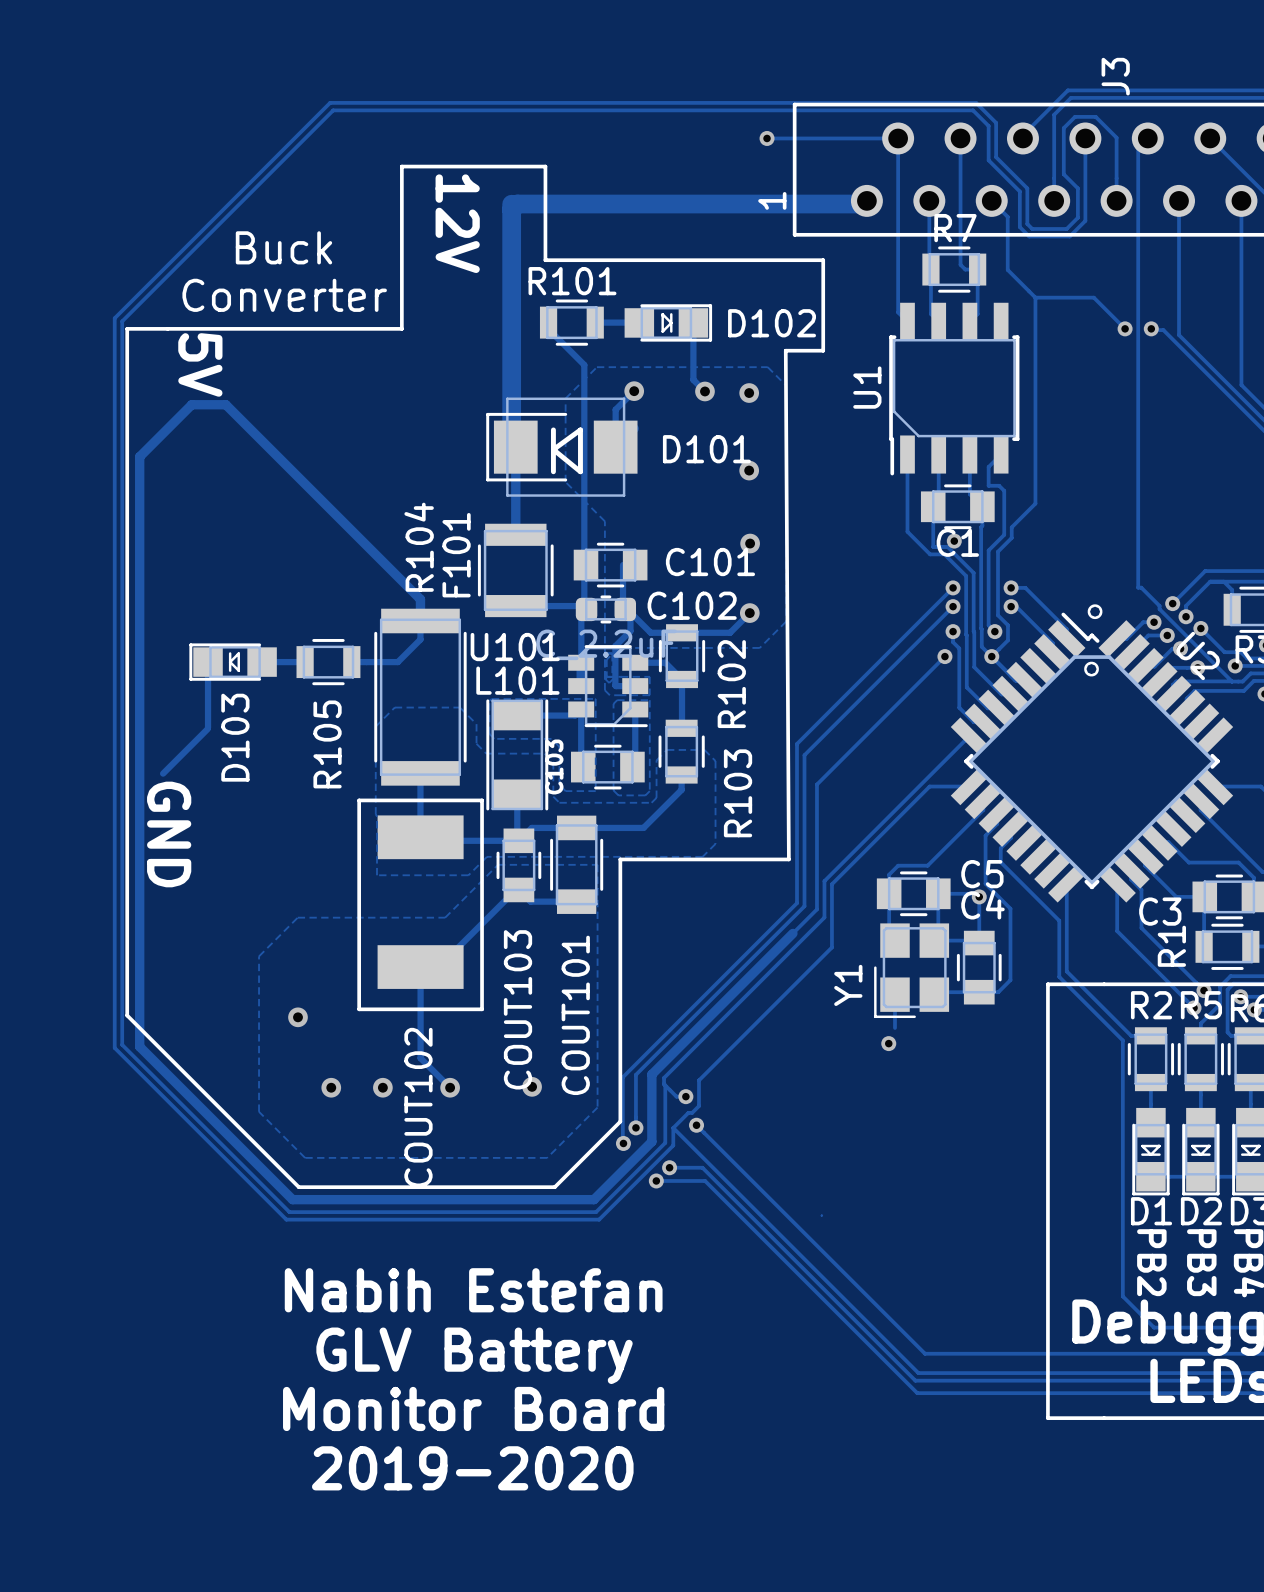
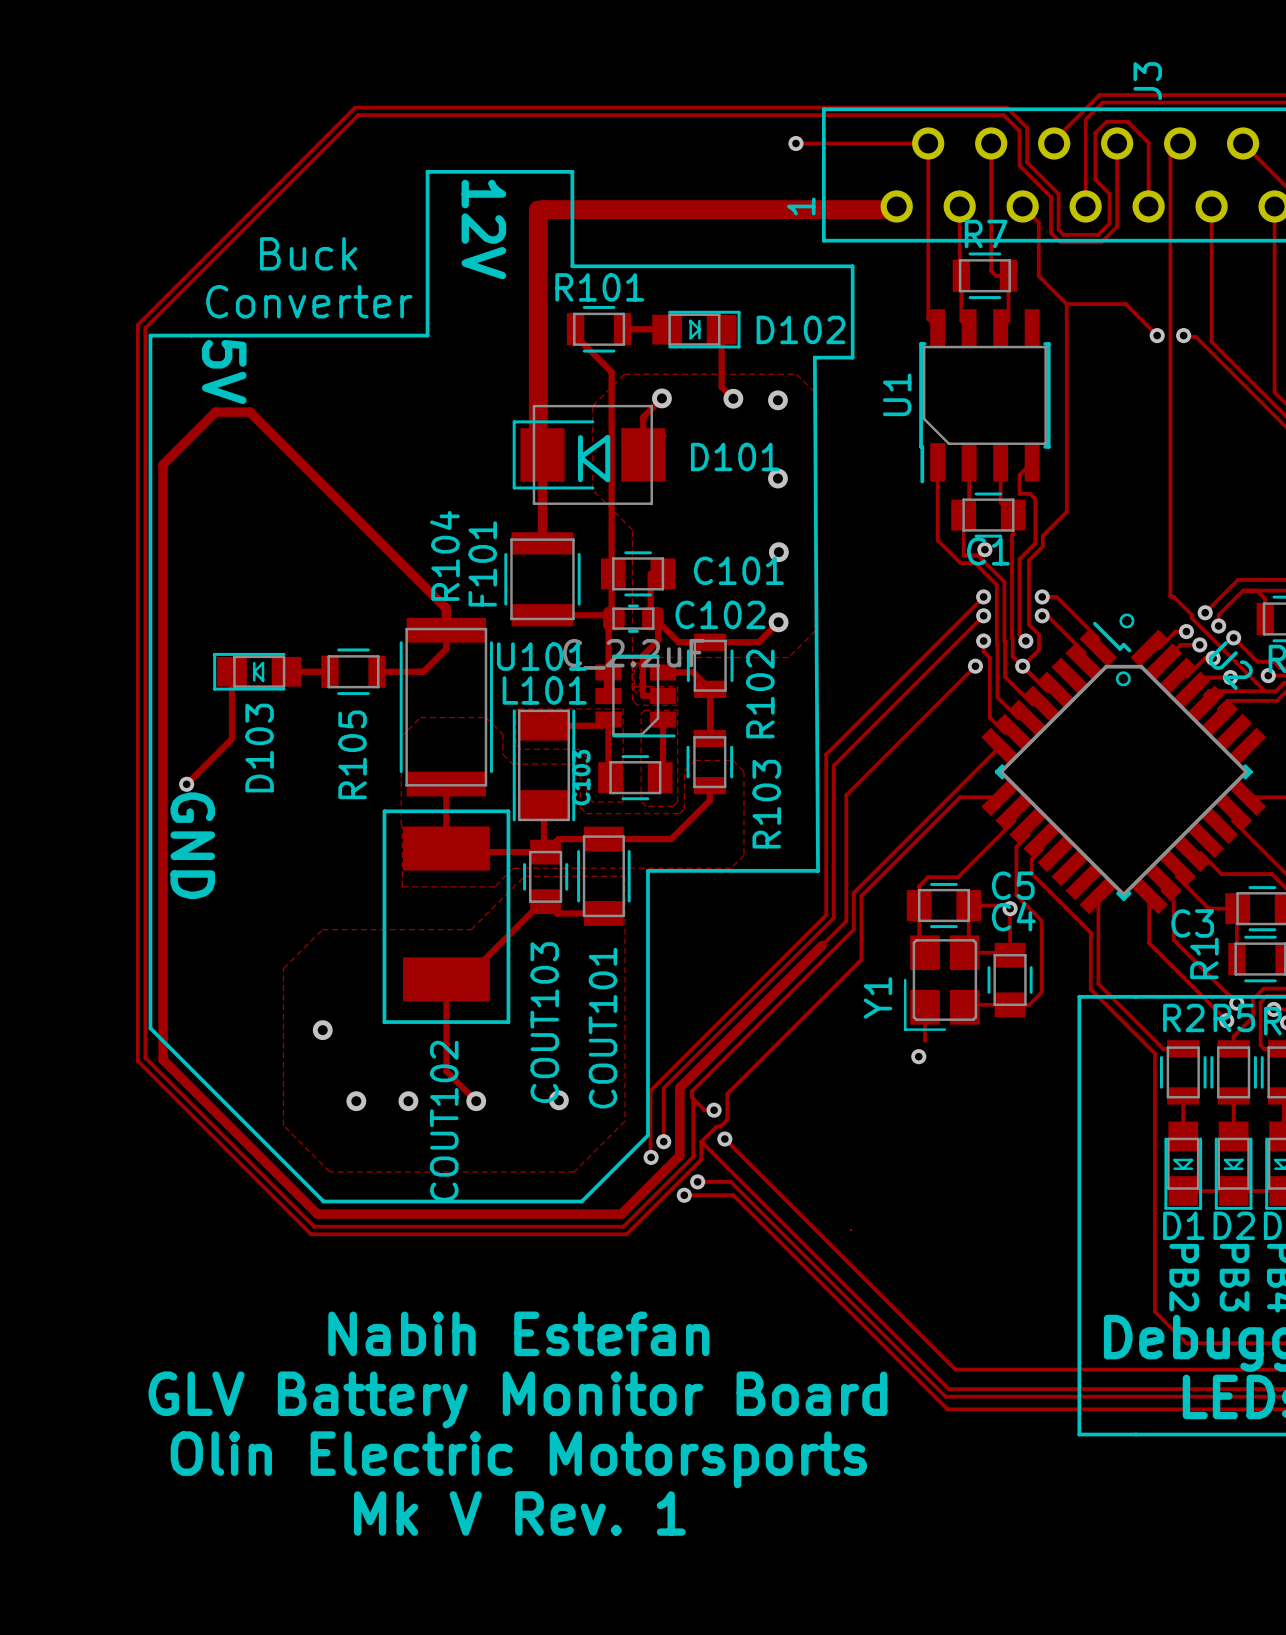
via: none -> (186, 784)
text position: Nabih Estefan (473, 1290) -> Nabih Estefan (518, 1333)
text: GLV Battery (474, 1355) -> none
text: none -> GLV Battery Monitor Board (517, 1399)
text: Monitor Board (473, 1408) -> none
text: none -> Olin Electric Motorsports (518, 1459)
text: 2019-2020 (472, 1468) -> none
text: none -> Mk V Rev. 1 (519, 1513)

